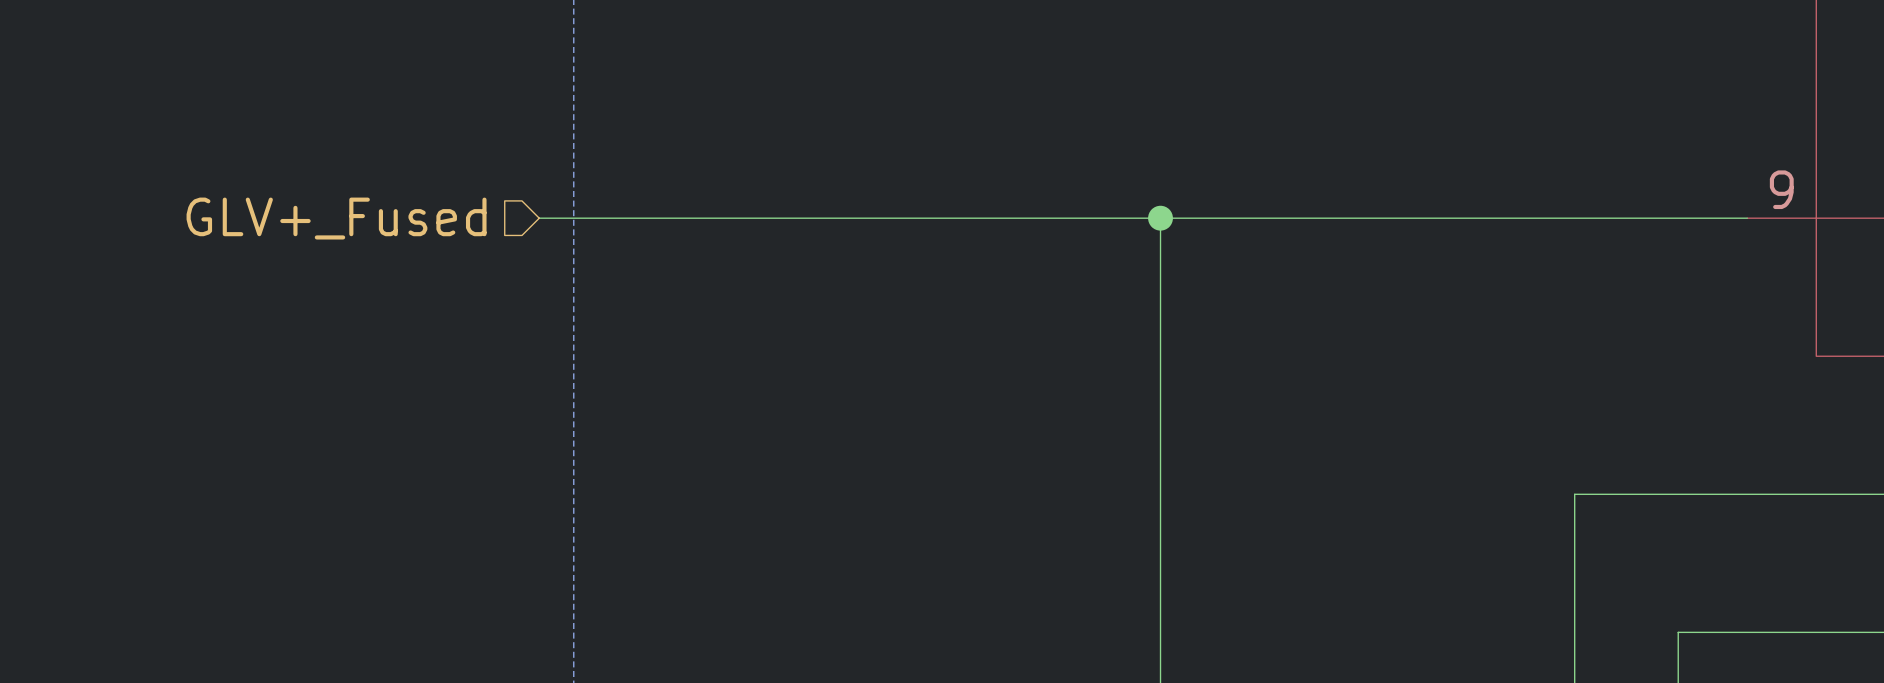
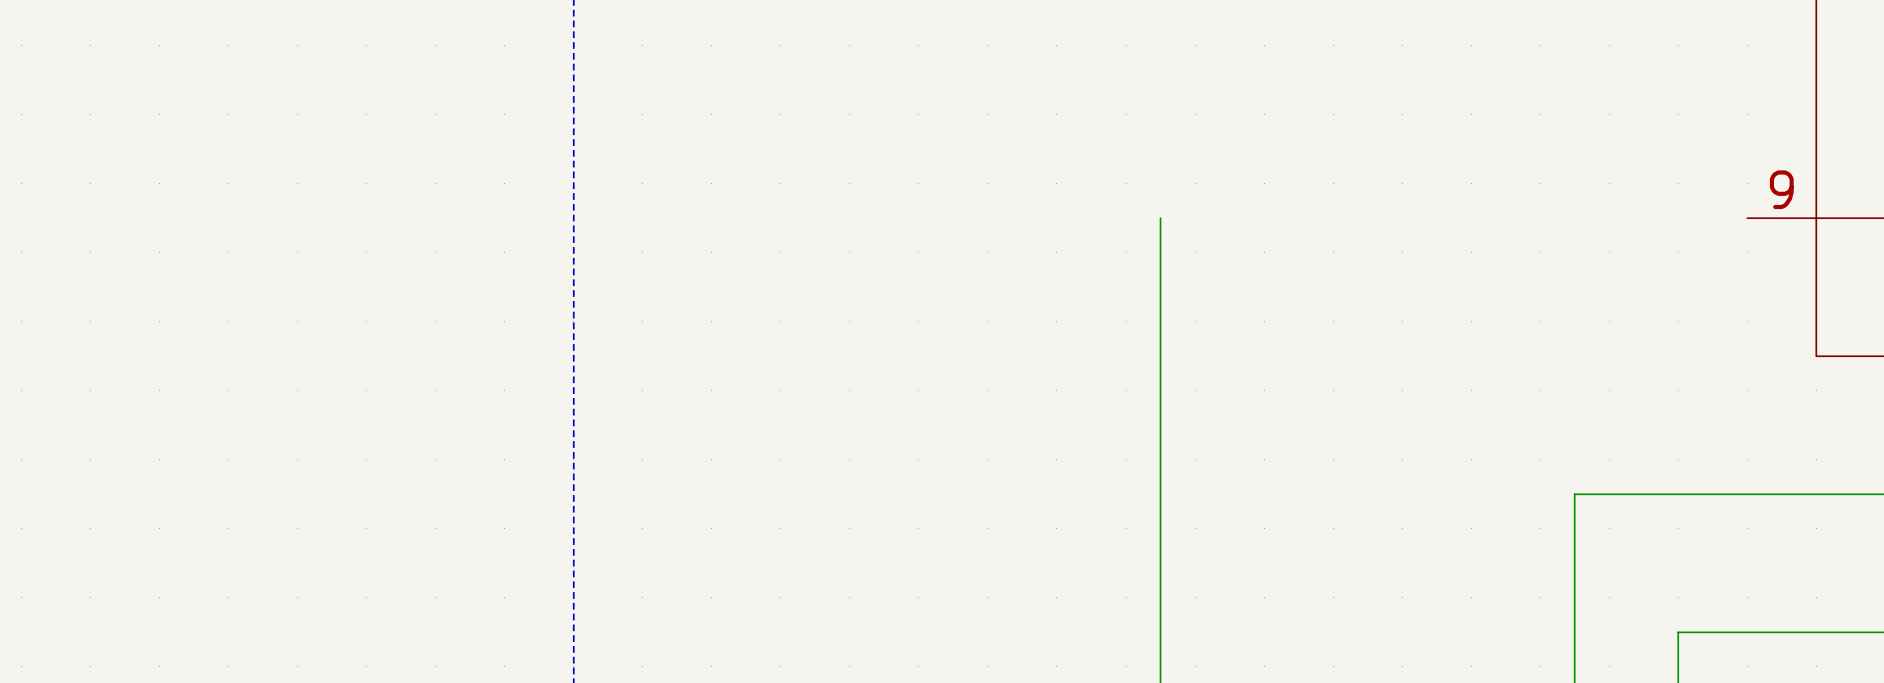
hierarchical label: GLV+_Fused (336, 218) -> none
wire: (539, 218) (1747, 218) -> none
junction: (1160, 218) -> none

